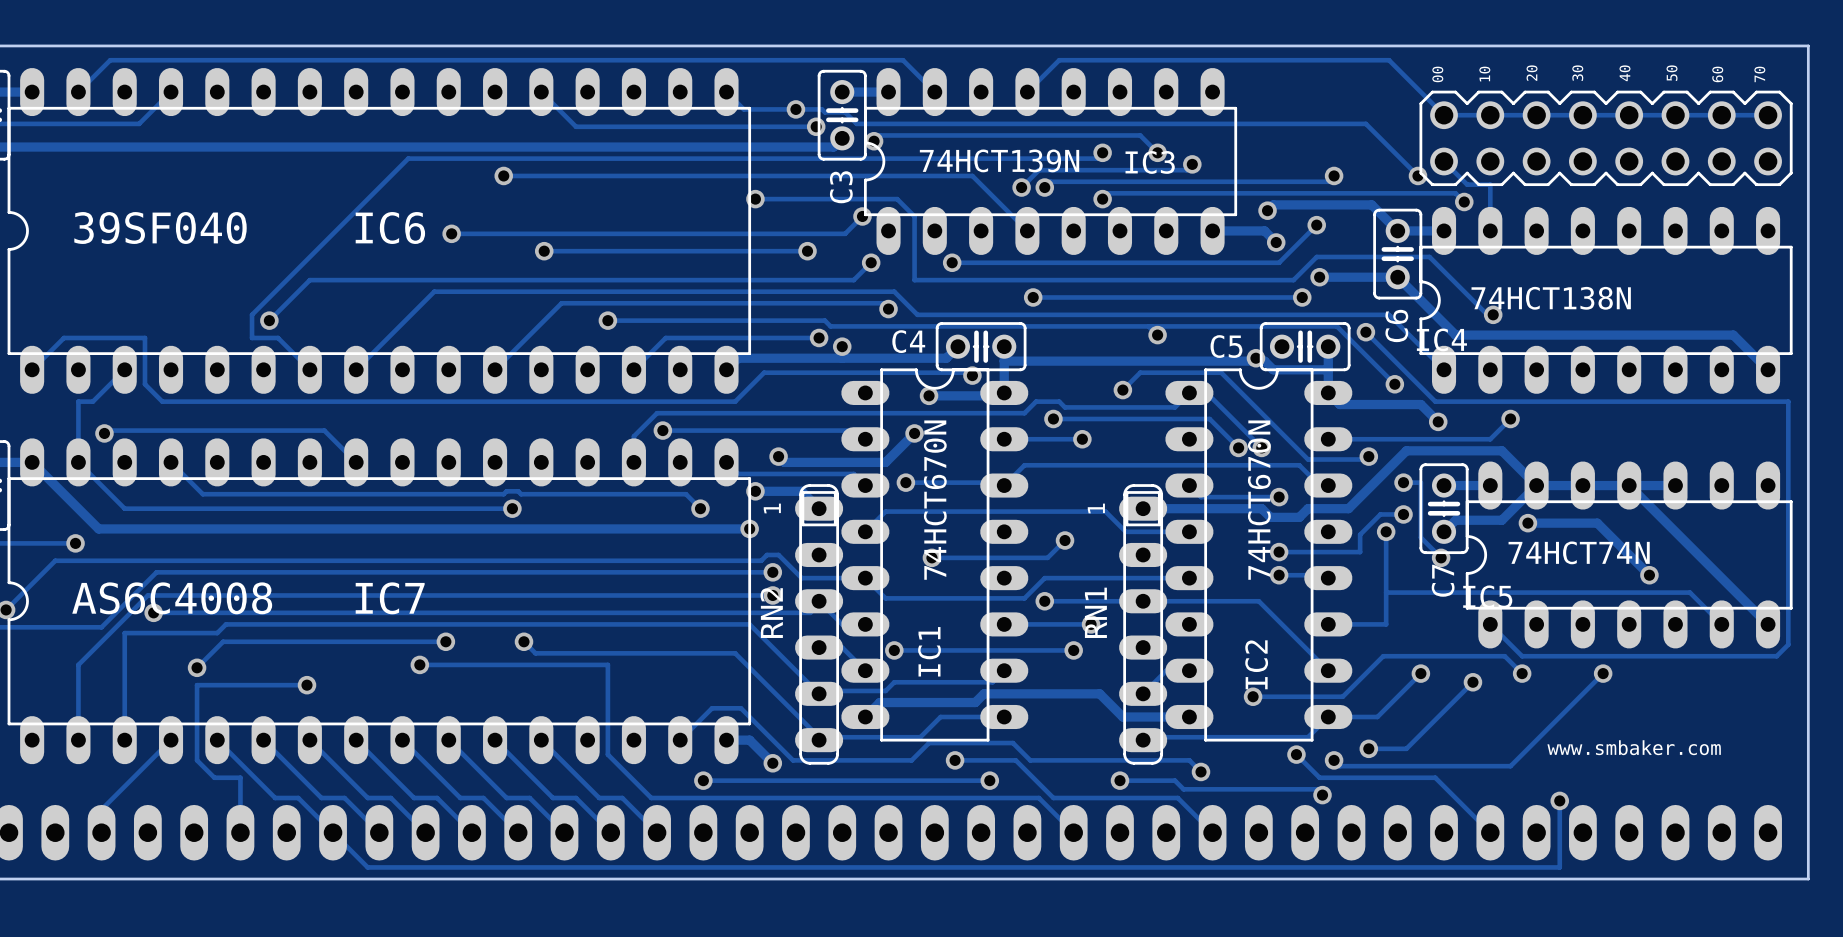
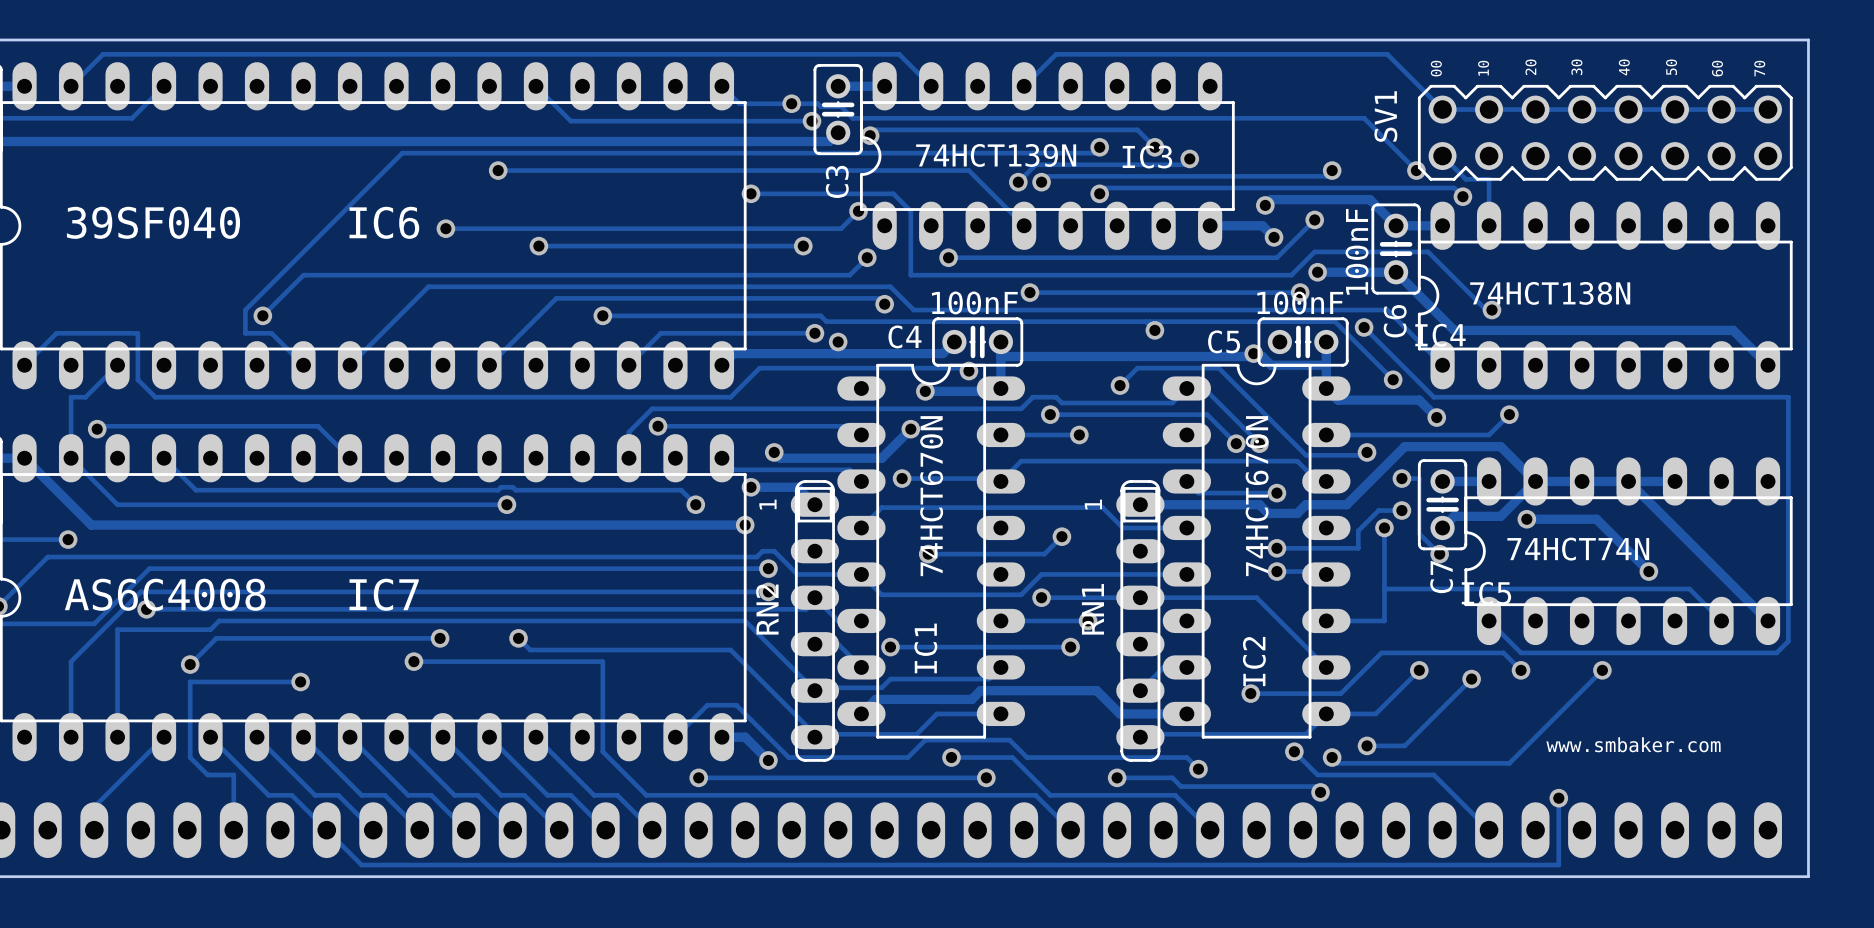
SV1 name: none -> SV1 (1385, 116)
C6 value: none -> 100nF (1357, 251)
C4 value: none -> 100nF (974, 302)
C5 value: none -> 100nF (1300, 302)

